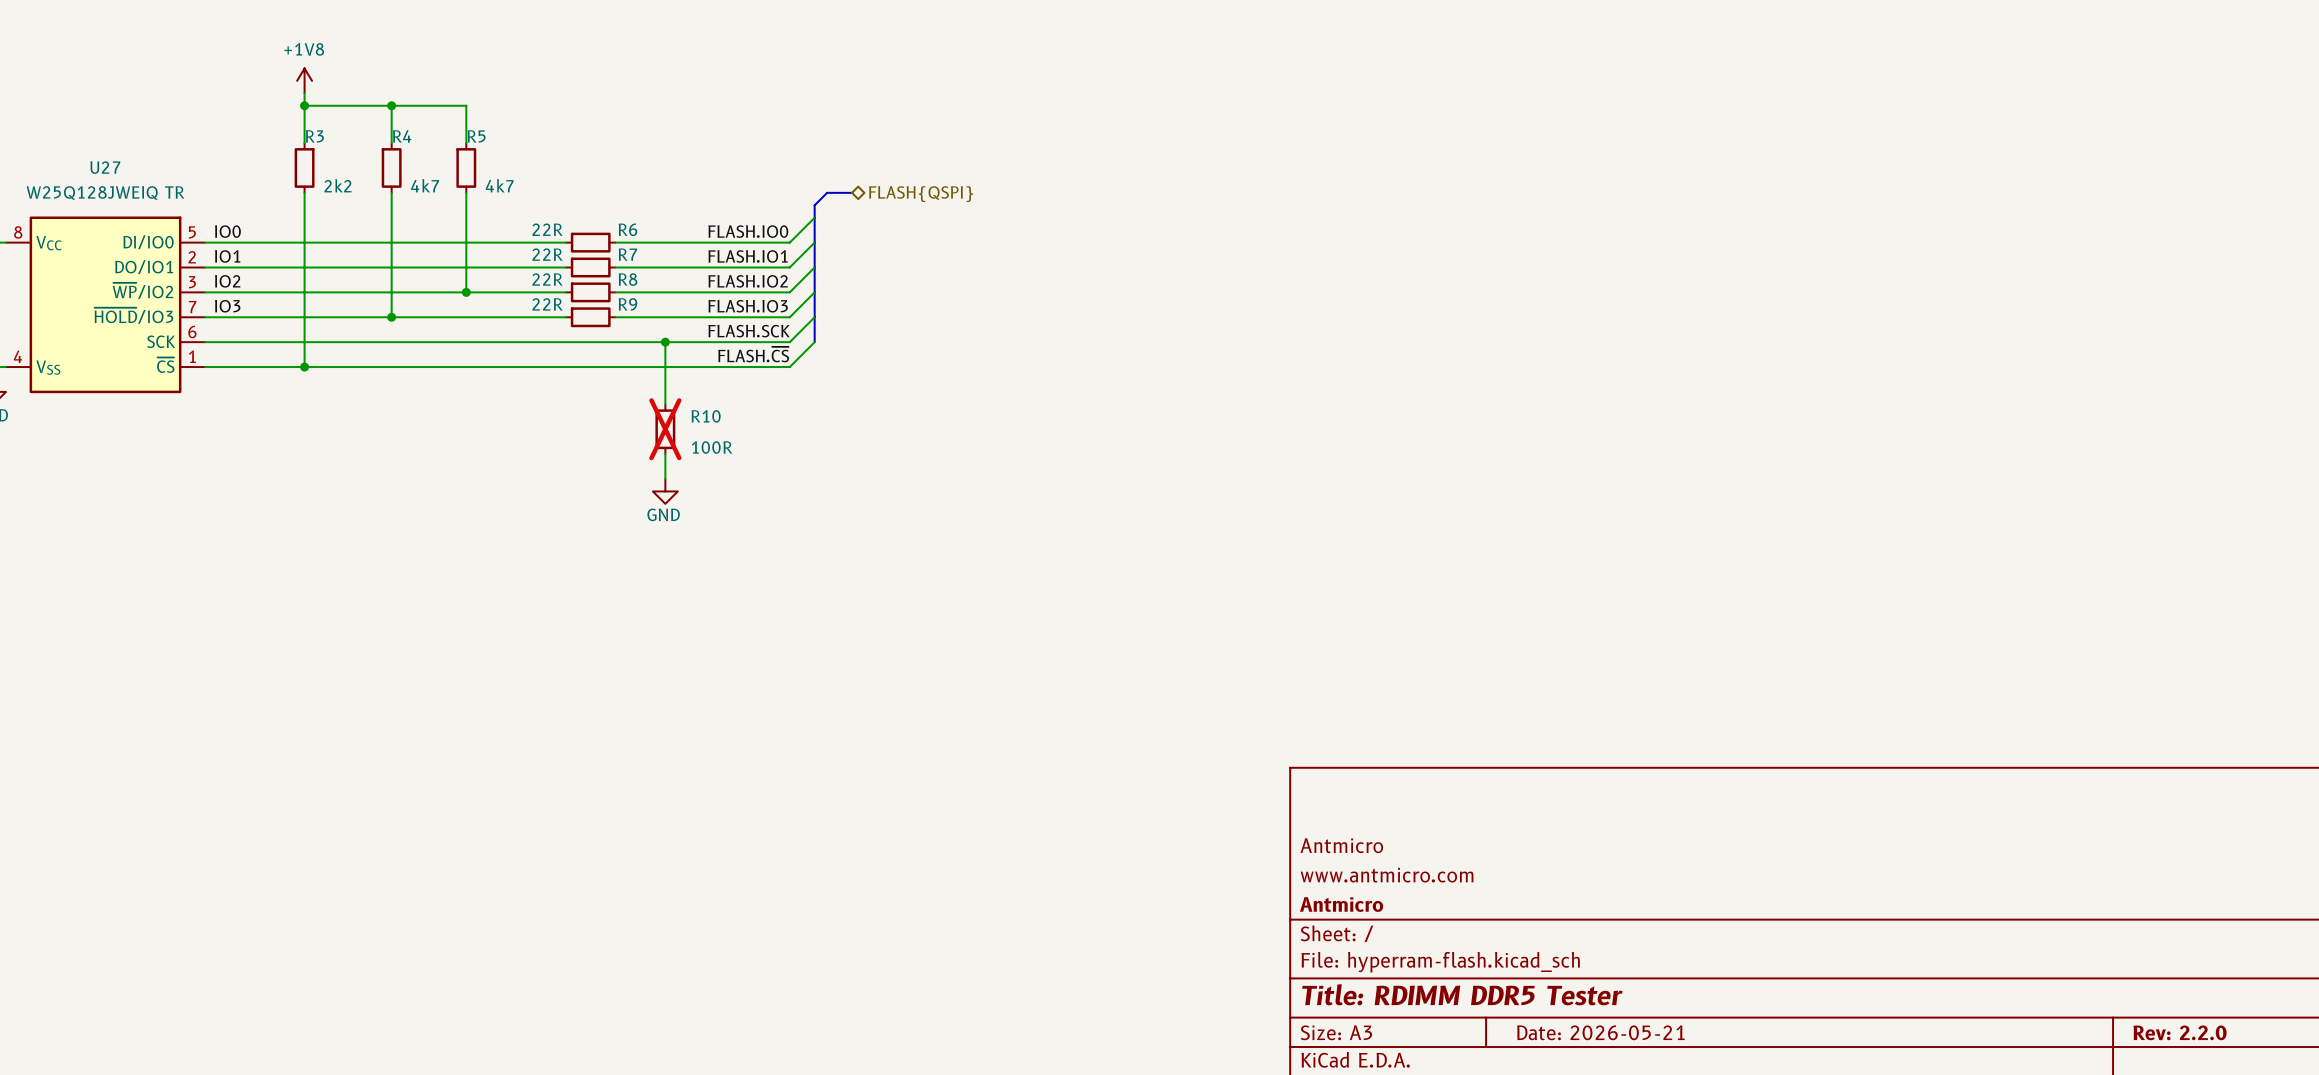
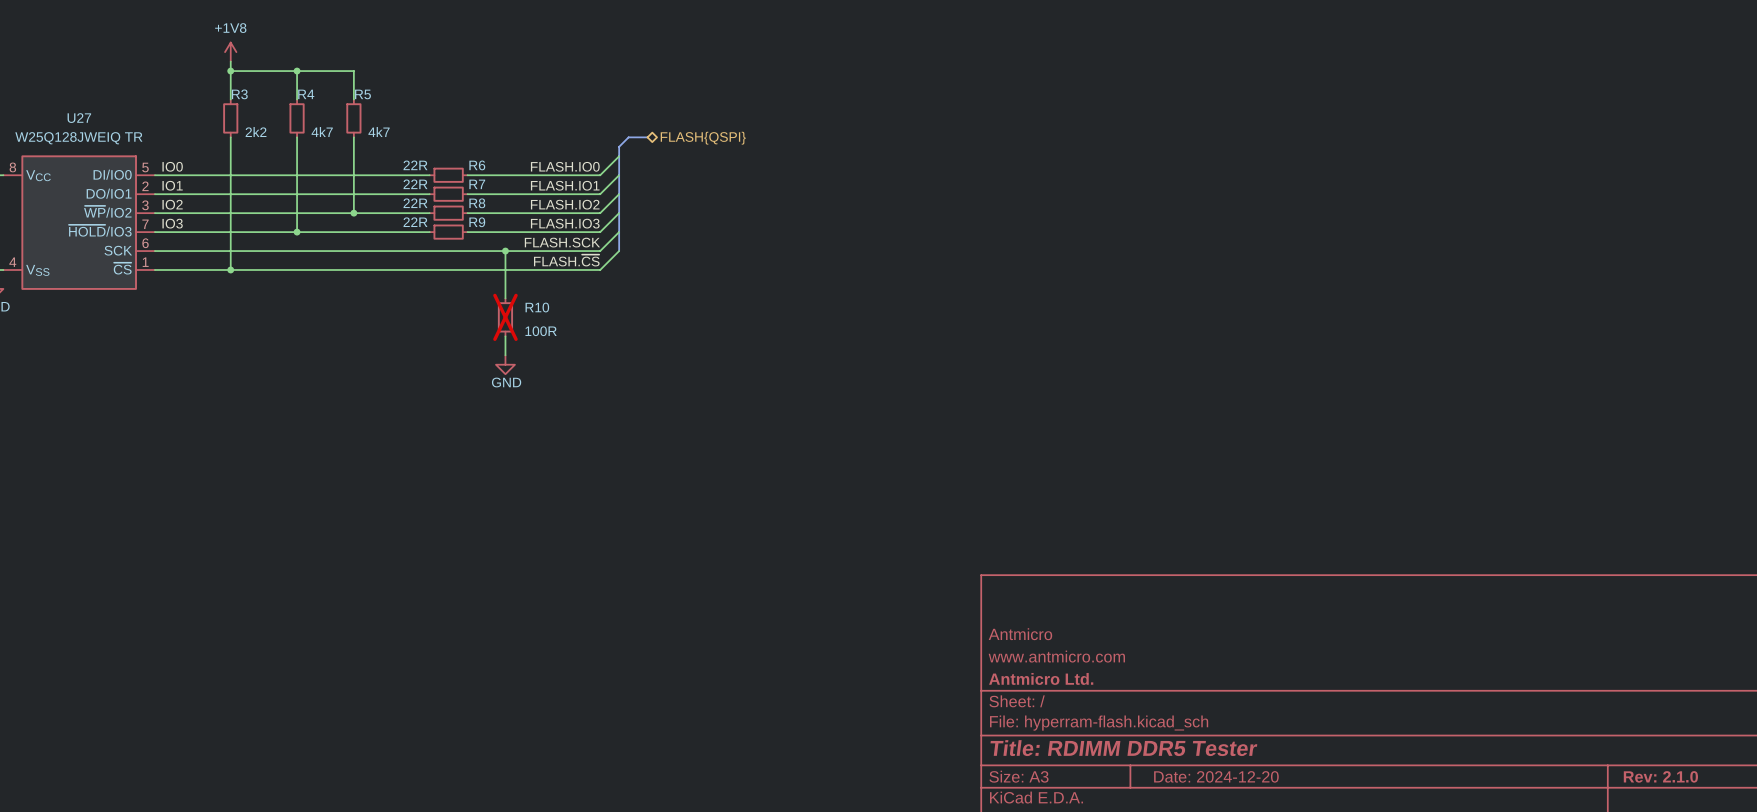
title block: Antmicro (1341, 904) -> Antmicro Ltd. (1041, 678)
title block: Date: 2026-05-21 (1600, 1032) -> Date: 2024-12-20 (1216, 776)
title block: Rev: 2.2.0 (2180, 1032) -> Rev: 2.1.0 (1660, 776)

